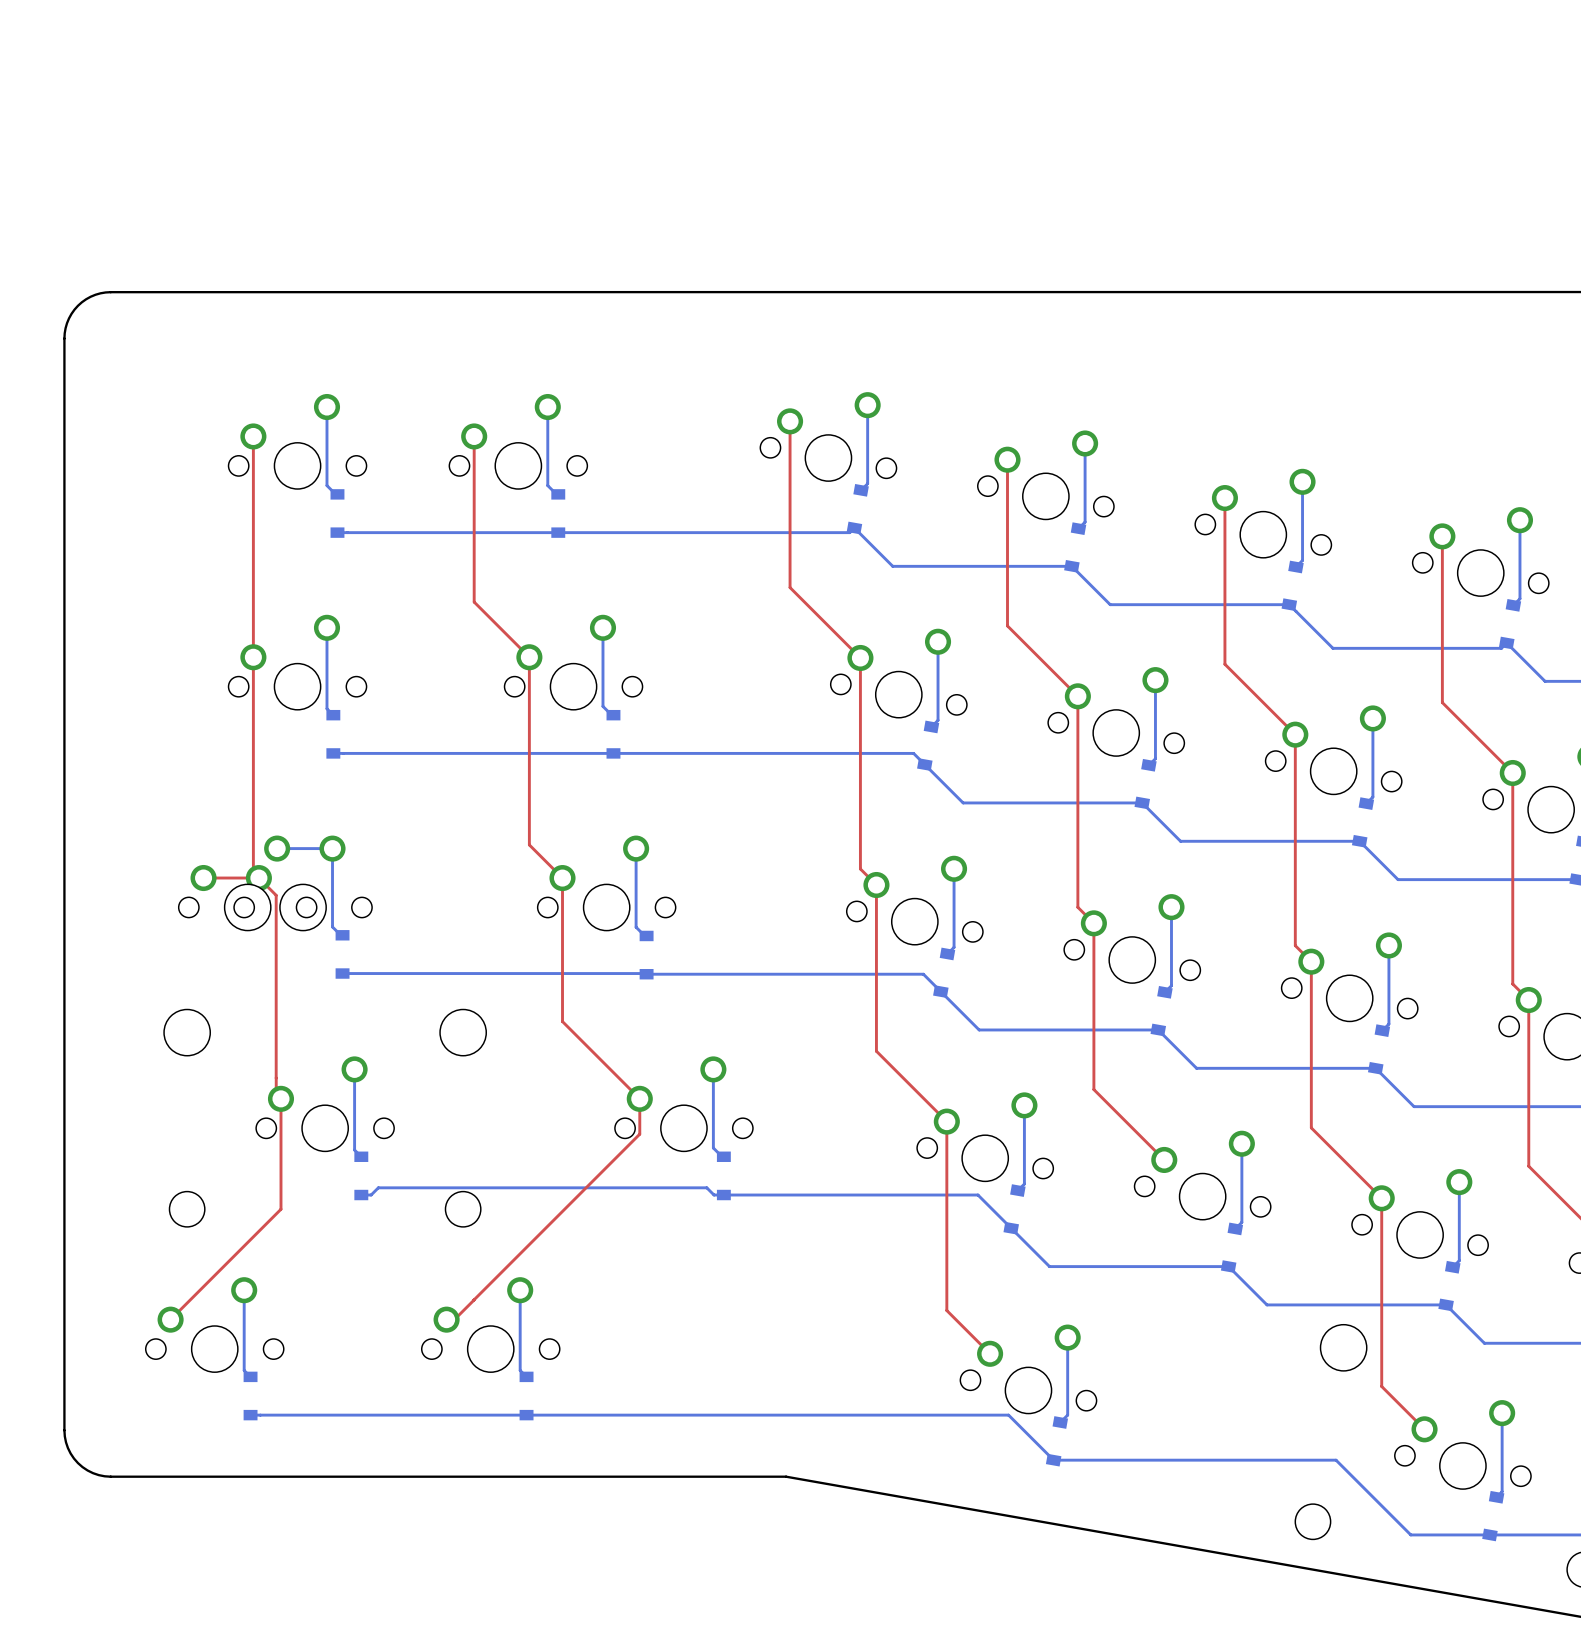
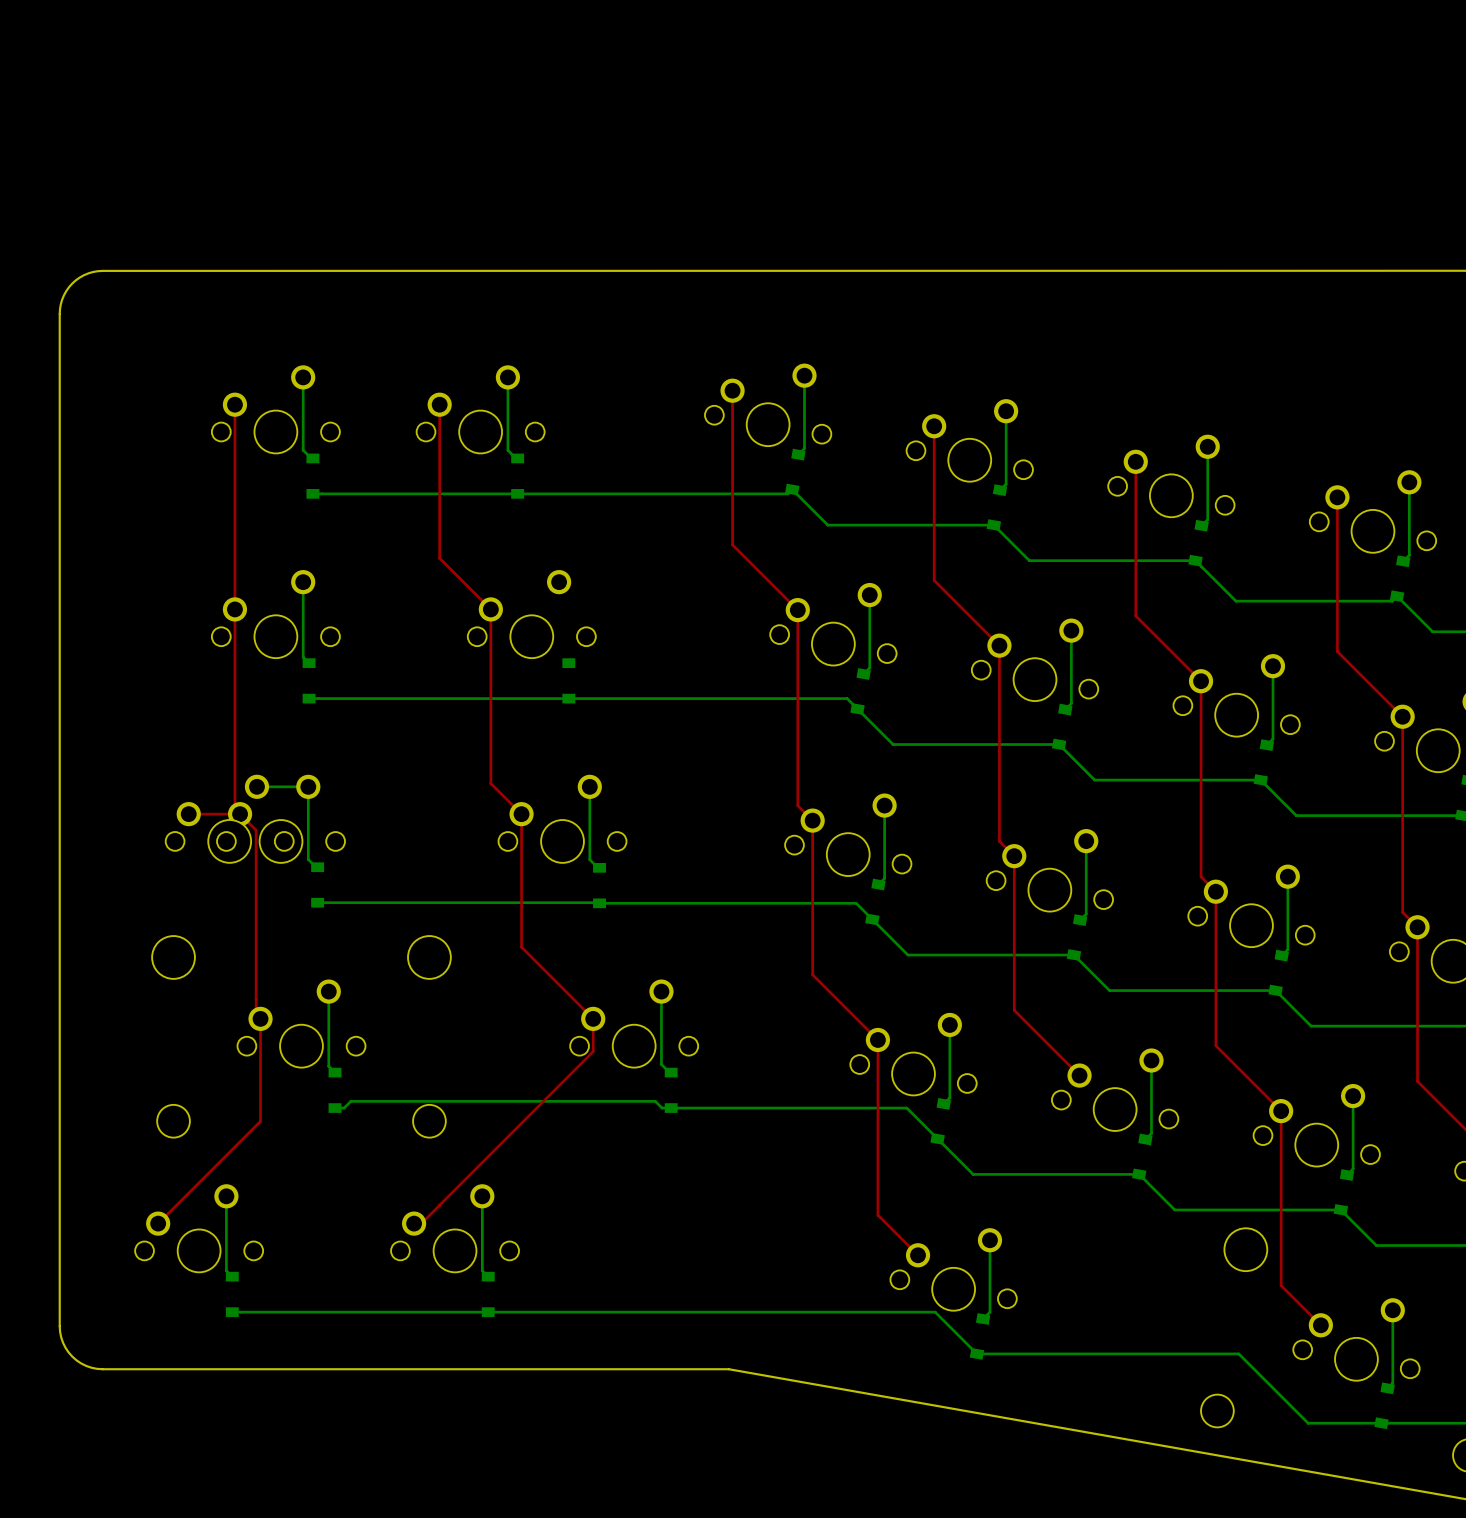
bottom track: (602, 627) (602, 706) (613, 715) -> none

